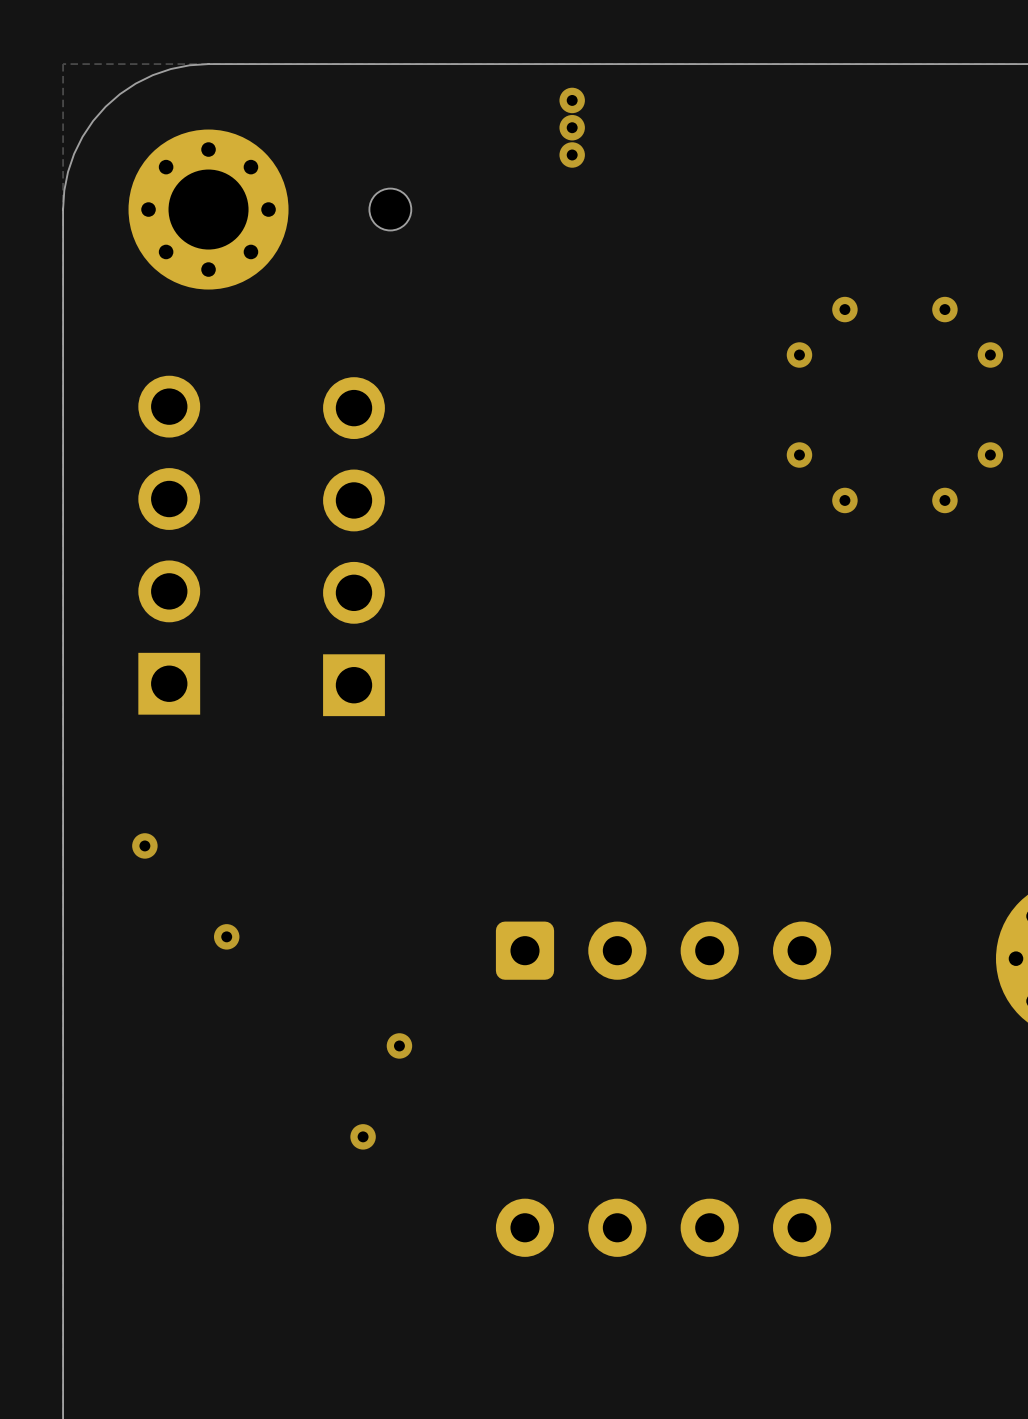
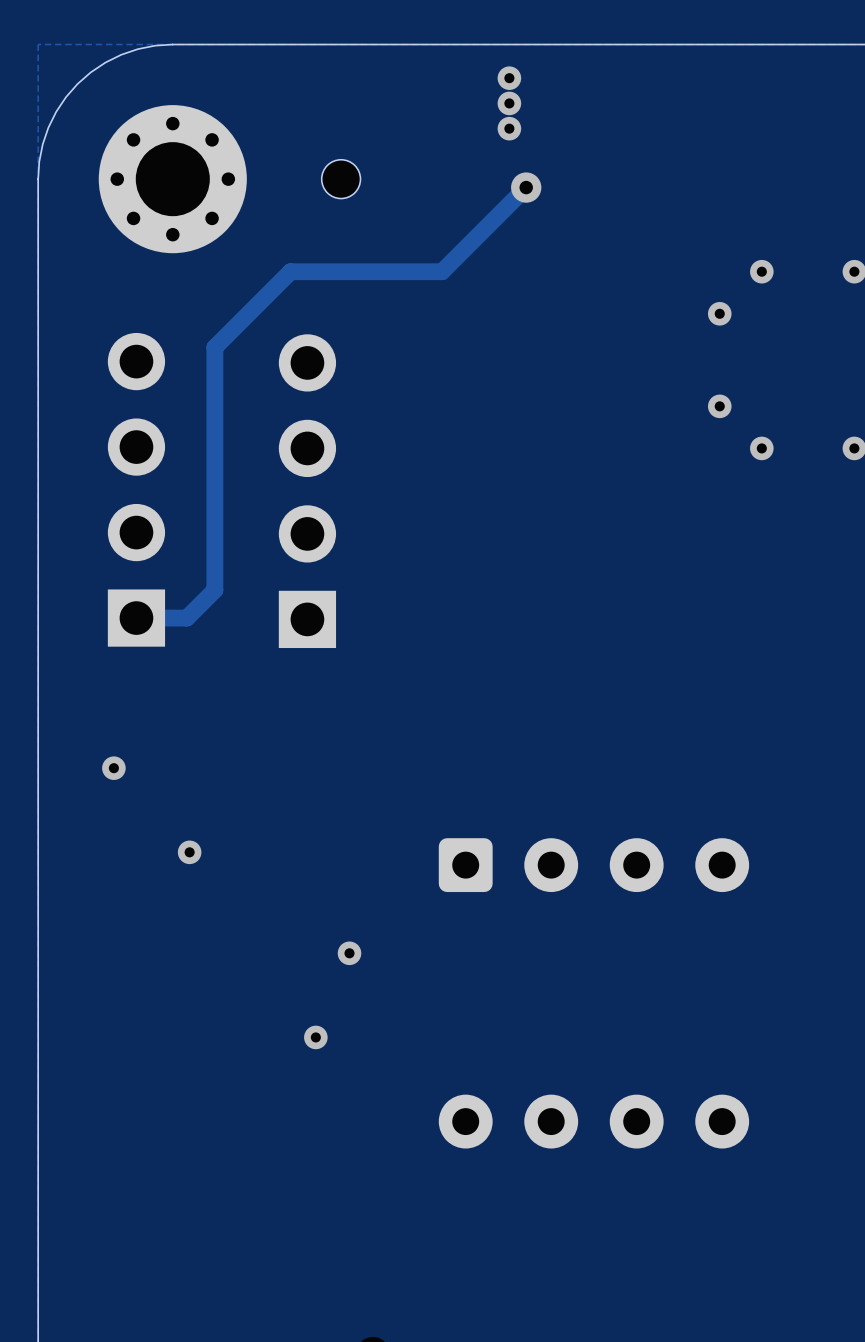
track: none -> (526, 187) (442, 271) (290, 271) (214, 347) (214, 590) (186, 618) (136, 618)
via: none -> (526, 187)

